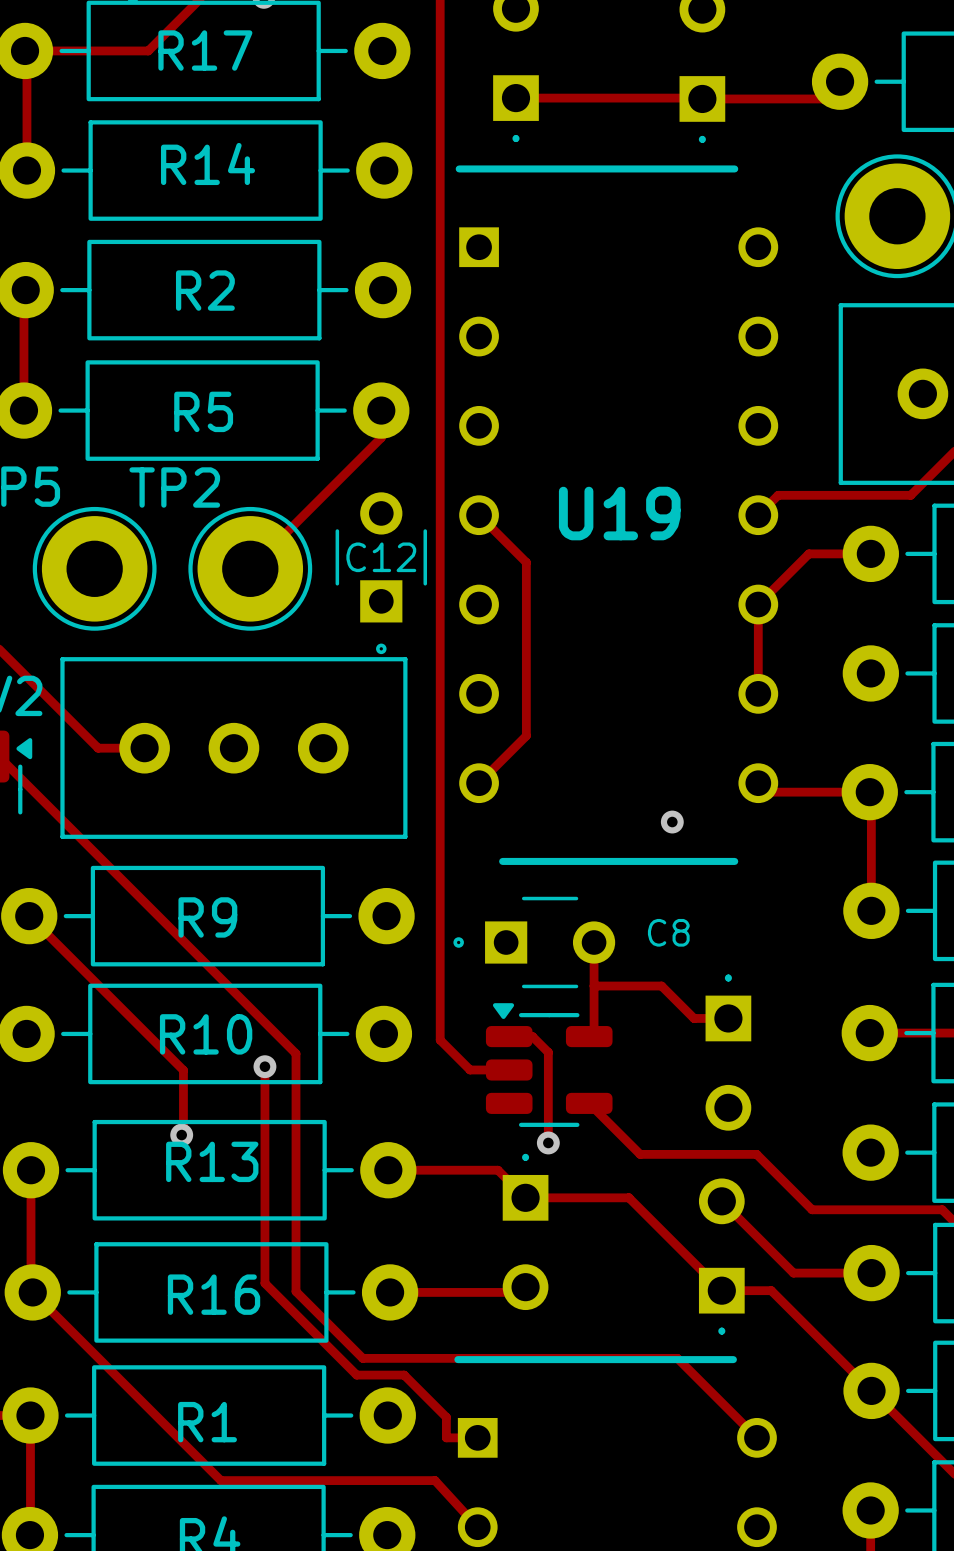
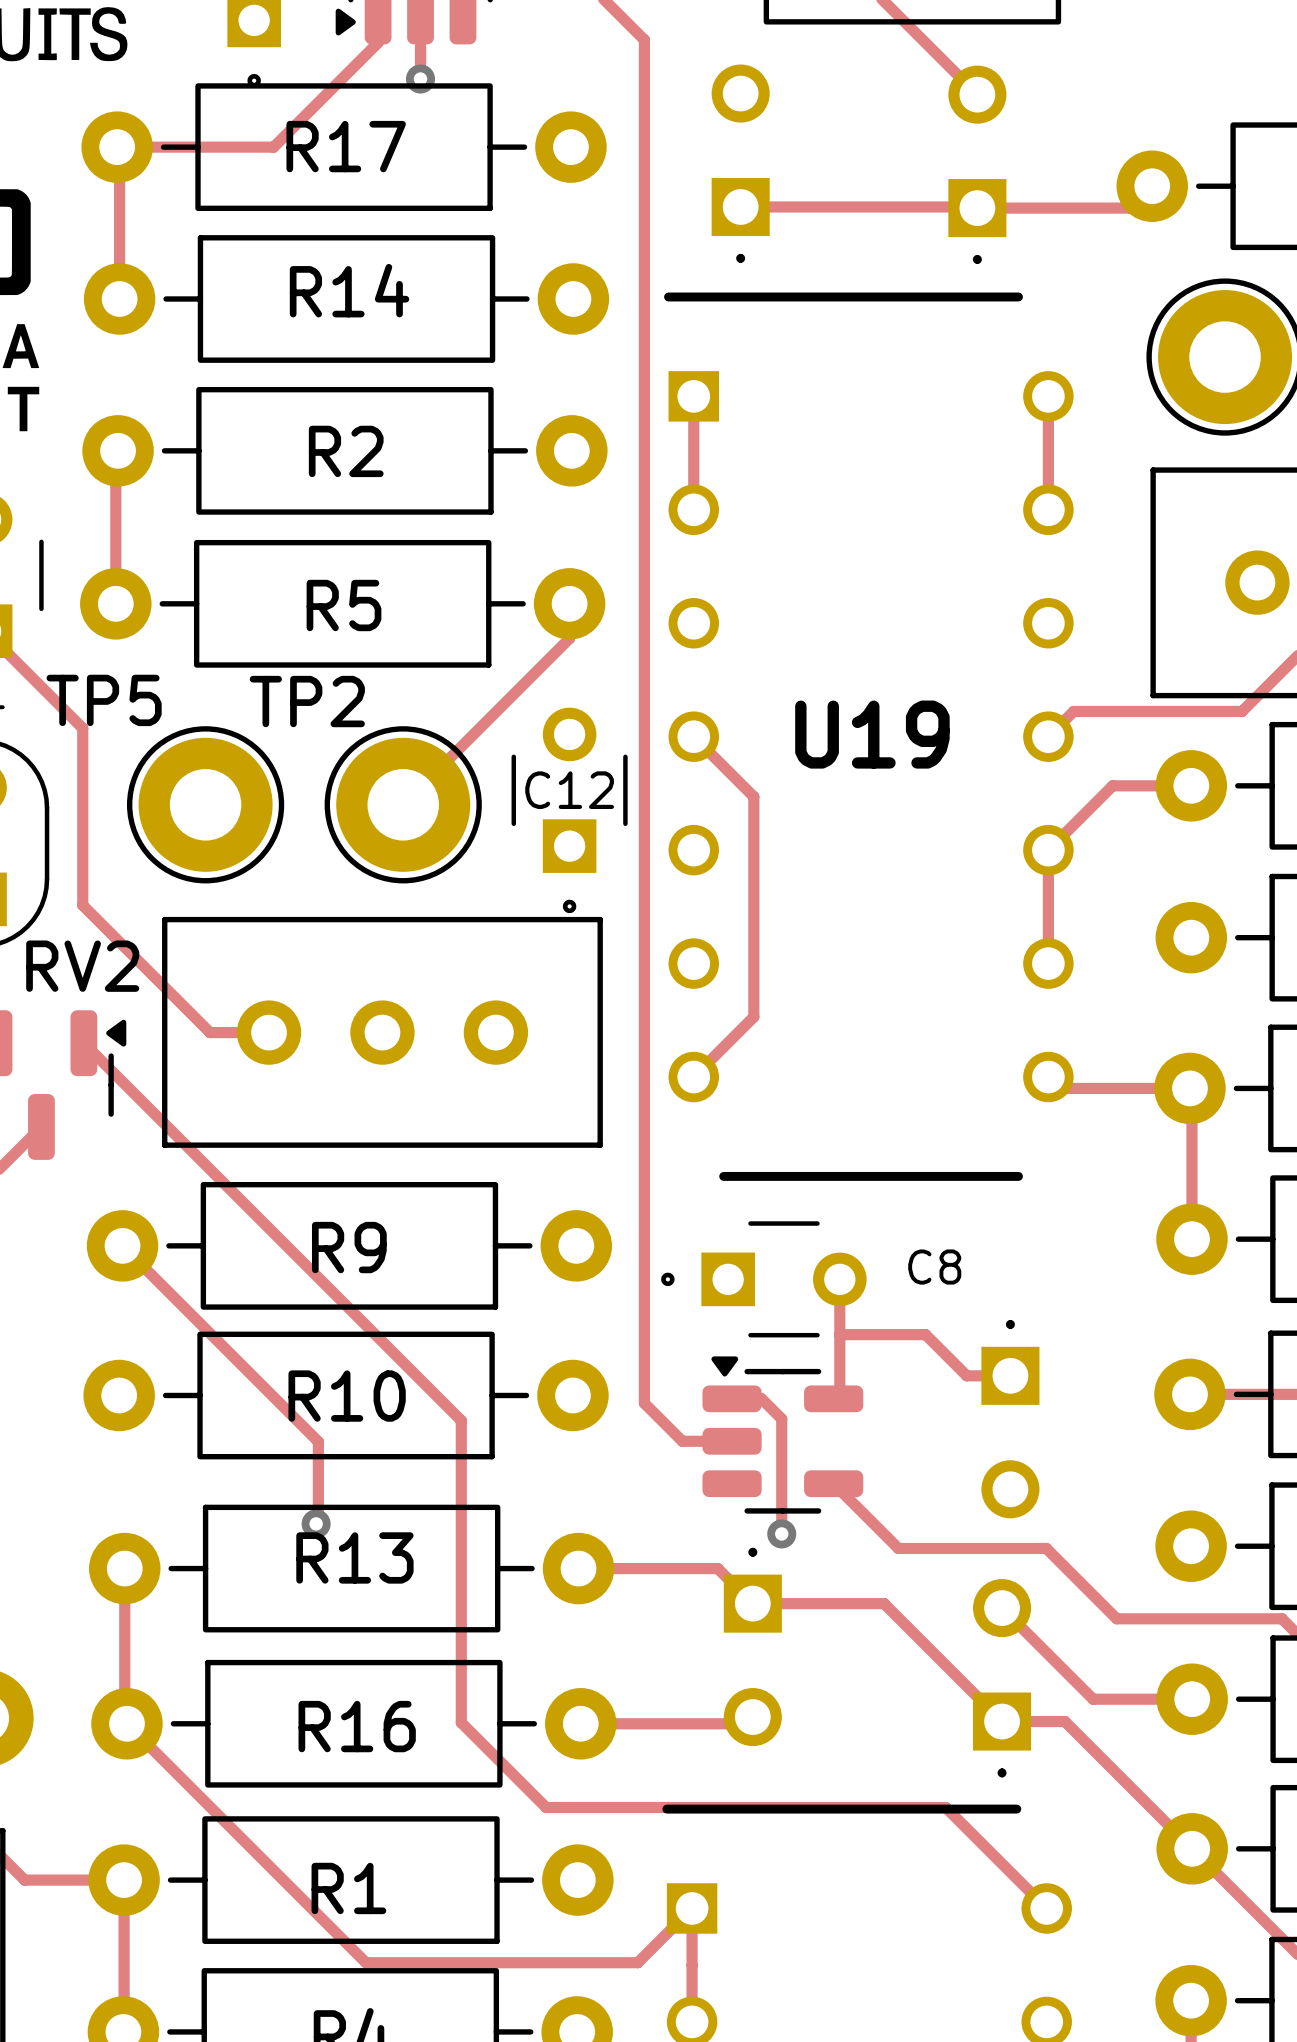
track: none -> (693, 396) (693, 509)
track: none -> (1048, 396) (1048, 509)
via: (672, 822) -> none
track: (264, 1066) (264, 1283) (356, 1375) (404, 1375) (446, 1417) (446, 1437) (477, 1437) -> none
via: (264, 1066) -> none
track: (435, 1480) (477, 1527) -> (637, 1962) (692, 1908) (692, 2021)

